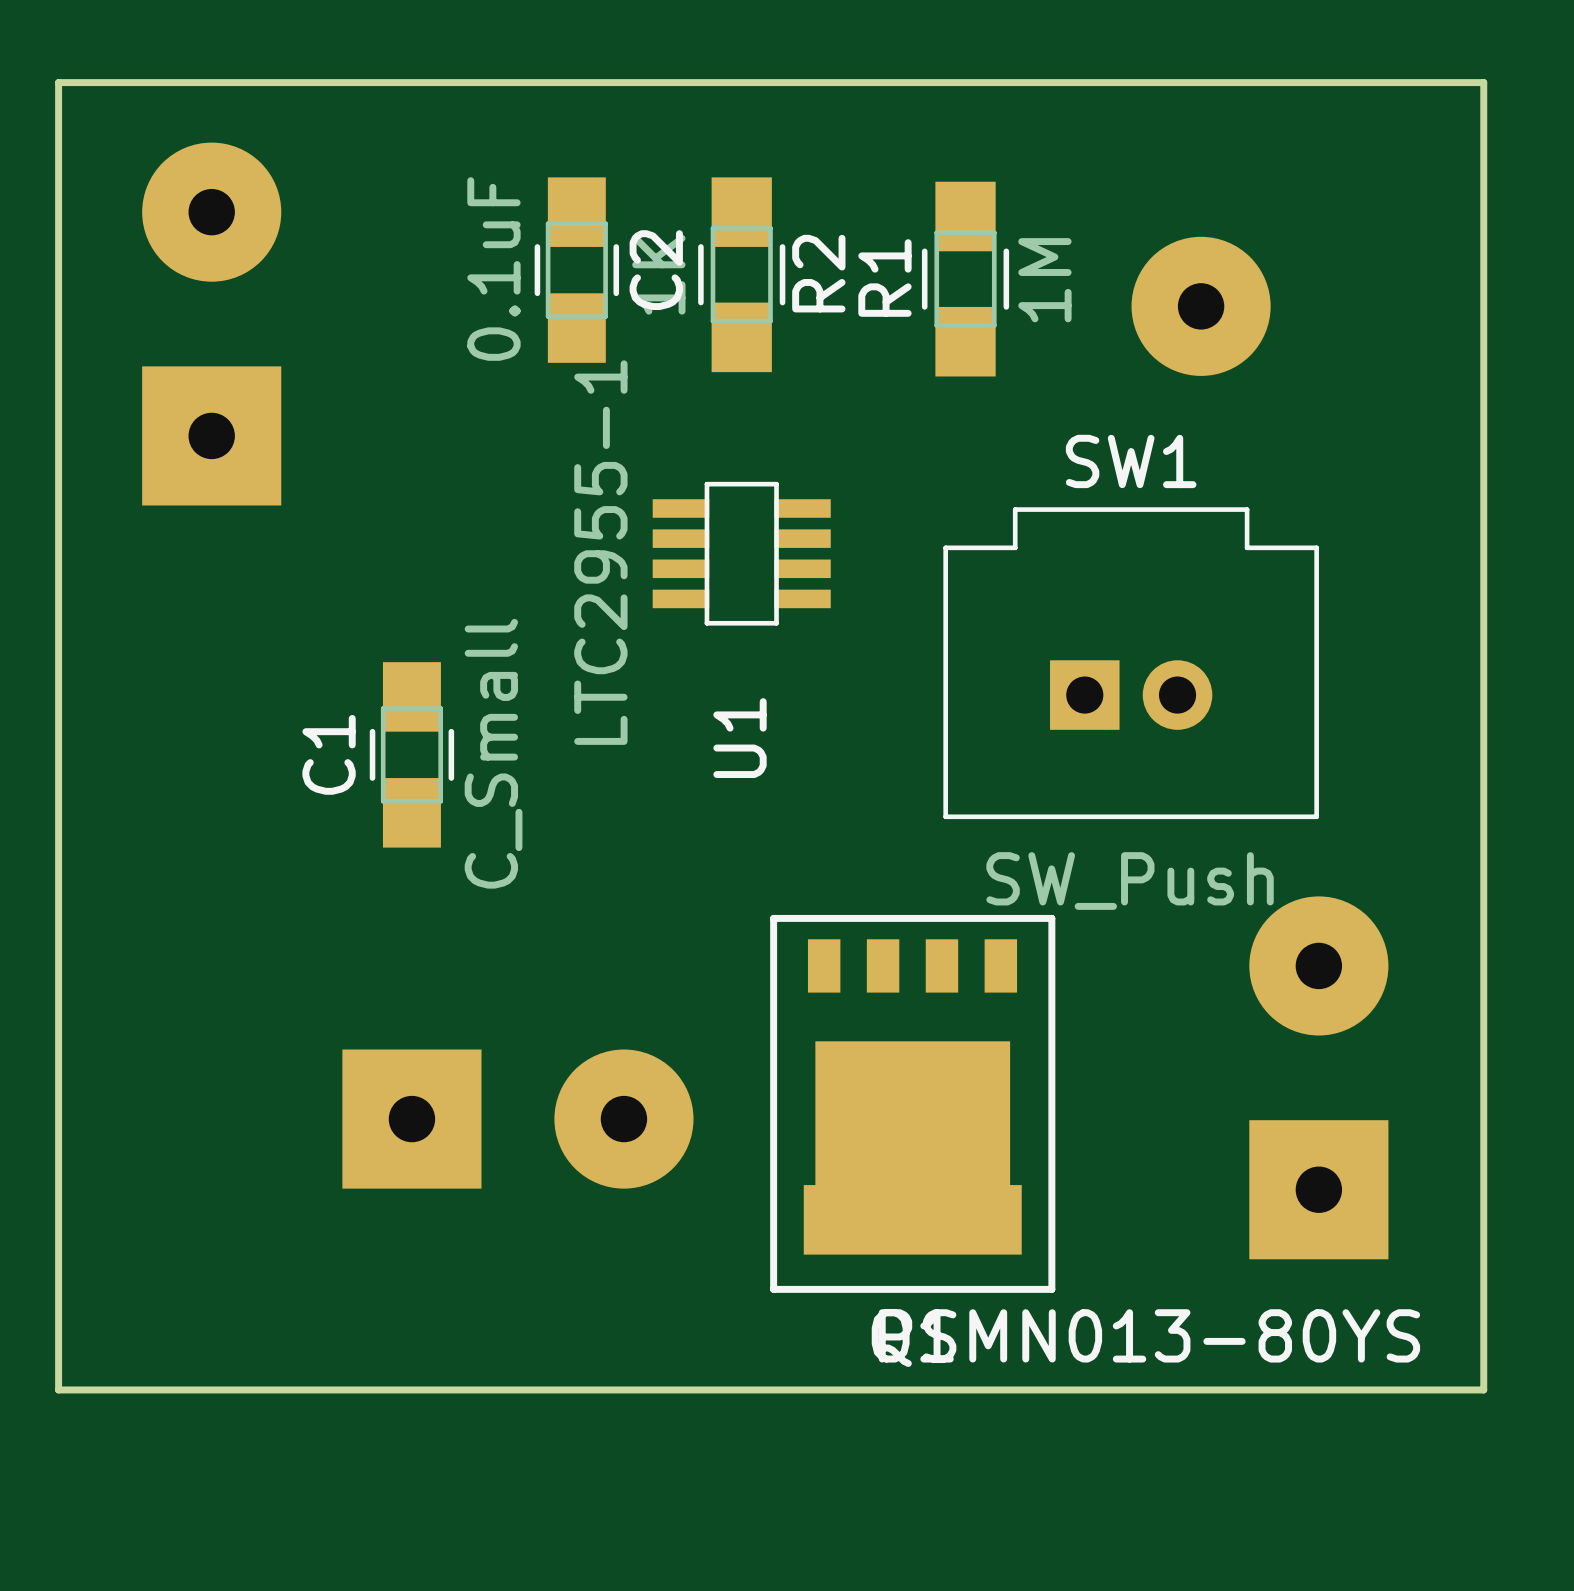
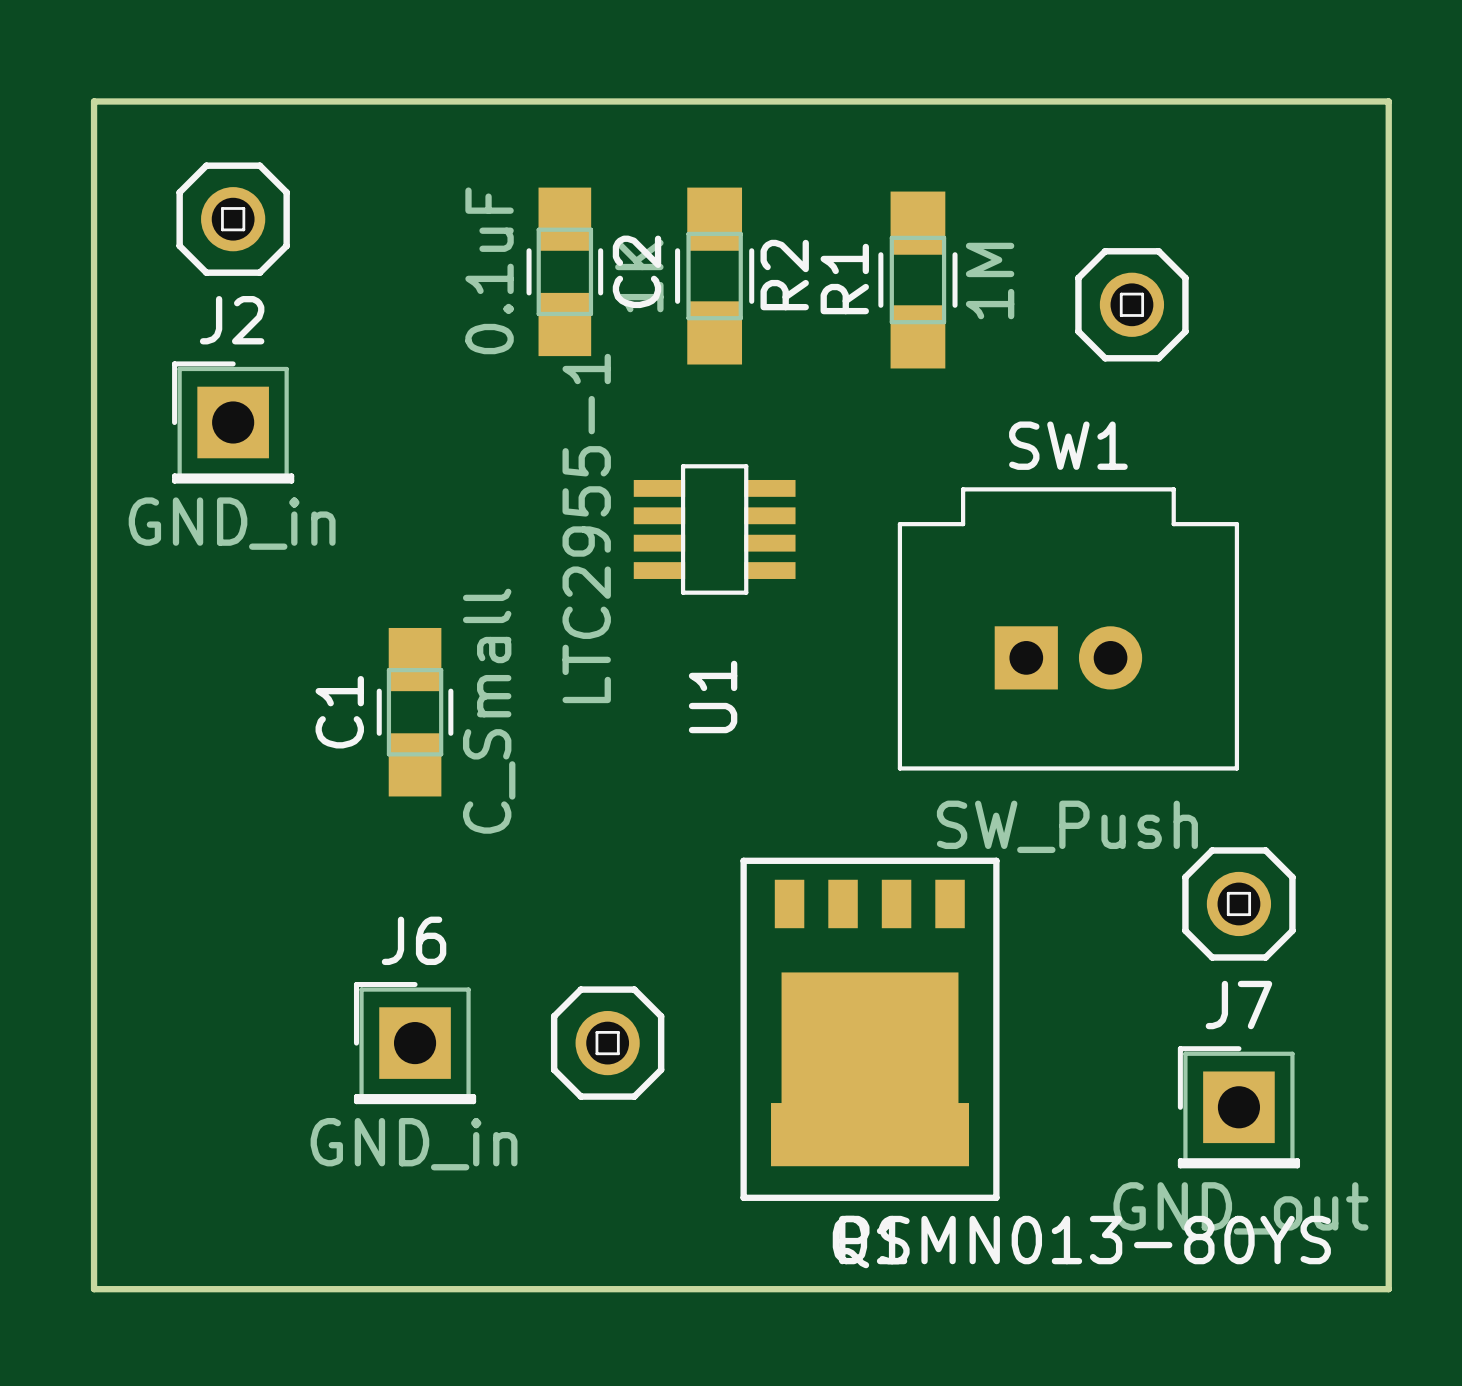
part footprint: [142, 142, 282, 282] -> [176, 162, 290, 276]
part footprint: [1131, 236, 1271, 376] -> [1075, 248, 1189, 362]
part: (211, 435) -> none
J2: none -> GND_in (233, 422)
part footprint: [1249, 896, 1389, 1036] -> [1182, 847, 1296, 961]
part footprint: [554, 1049, 694, 1189] -> [550, 986, 665, 1100]
part: (411, 1119) -> none
J6: none -> GND_in (415, 1043)
part: (1318, 1189) -> none
J7: none -> GND_out (1238, 1107)

